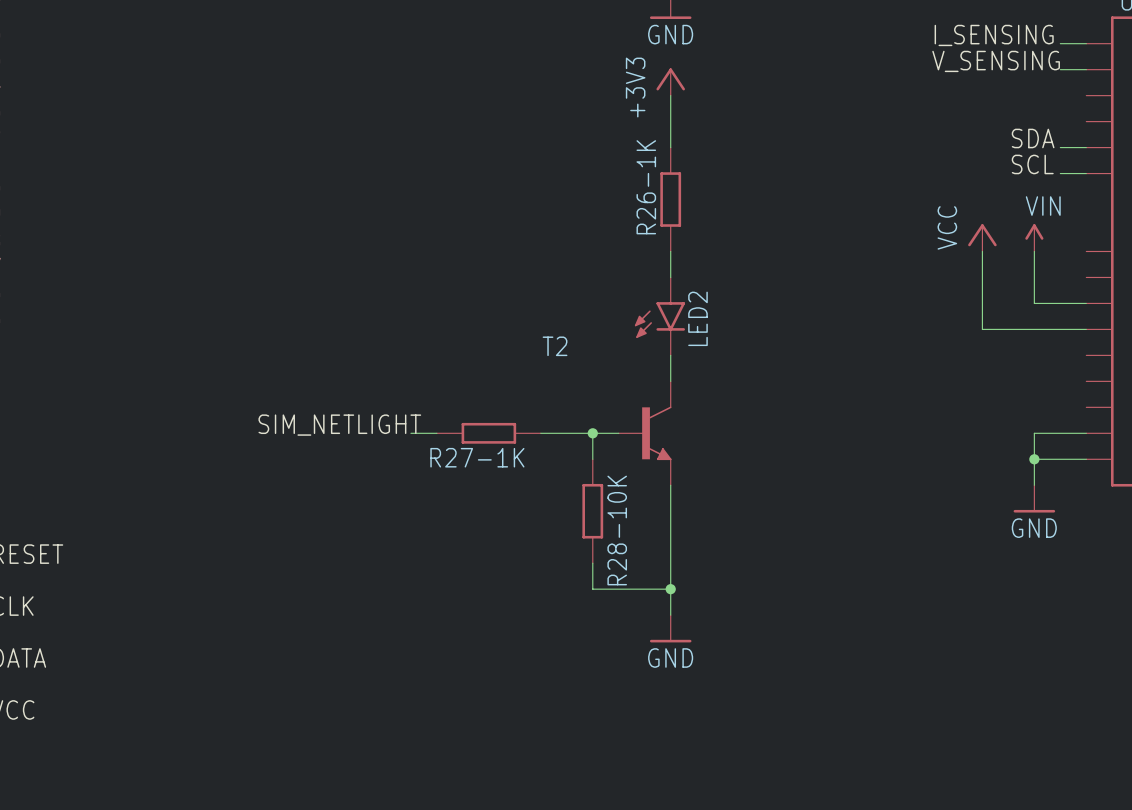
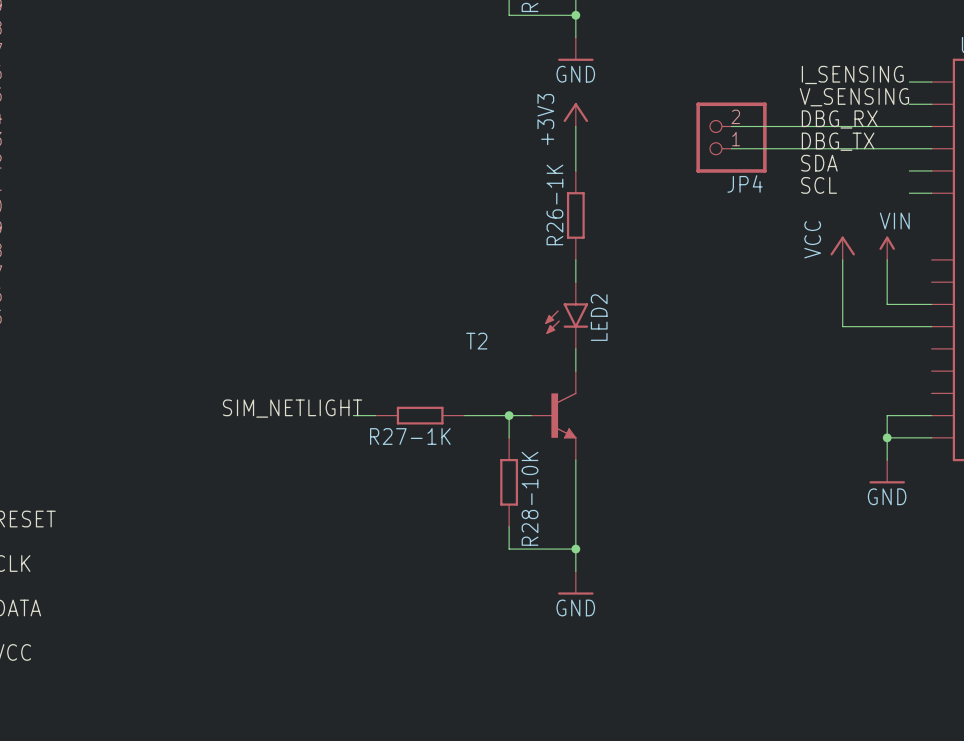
label: none -> DBG_RX (839, 119)
wire: none -> (731, 126) (931, 126)
JP4: none -> (731, 137)
label: none -> DBG_TX (838, 141)
wire: none -> (731, 148) (931, 148)
label position: SDA (1033, 138) -> SDA (819, 163)
label position: SCL (1032, 164) -> SCL (819, 185)

